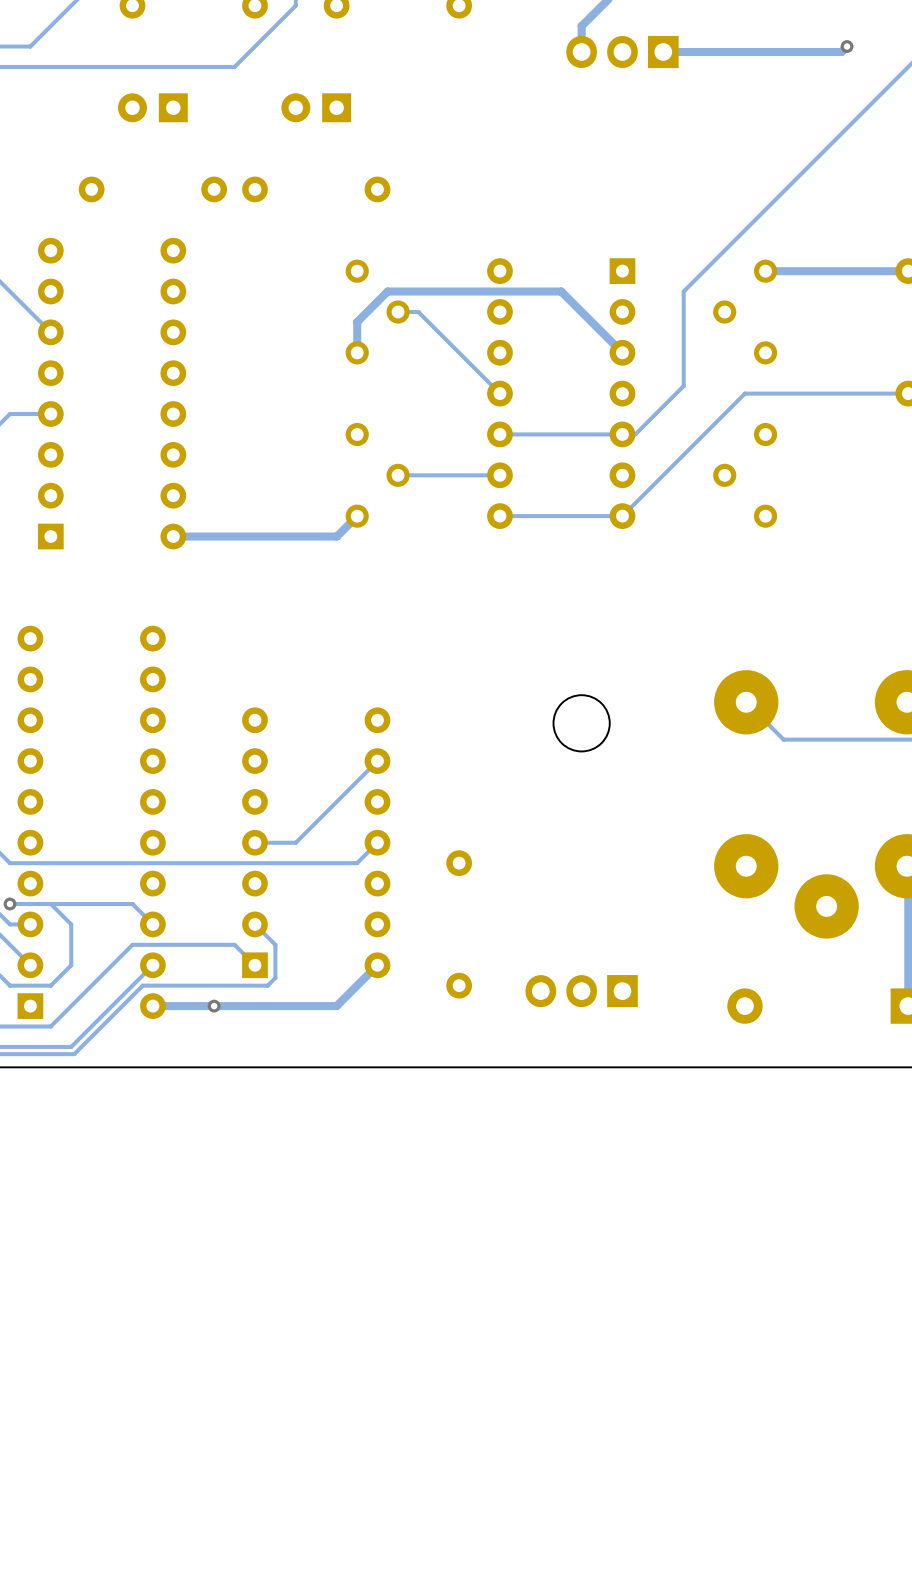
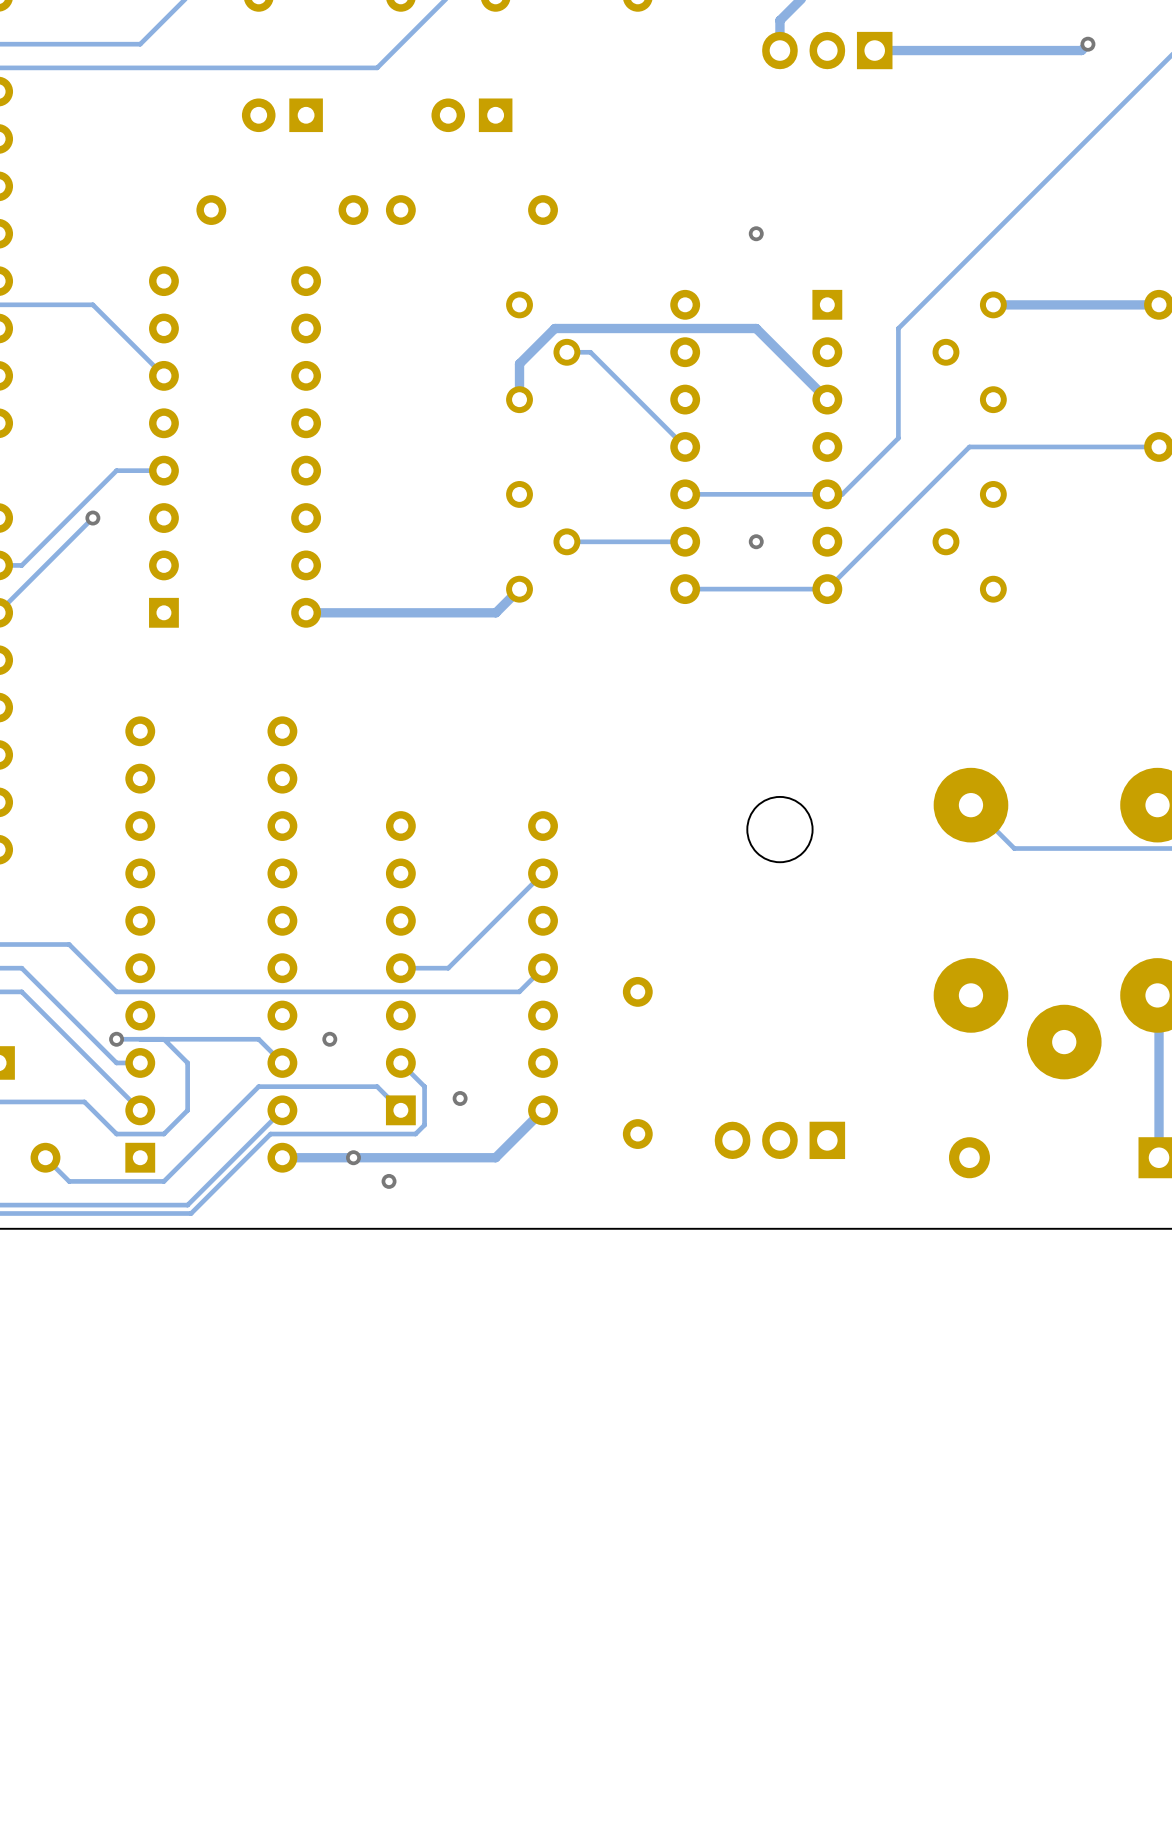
via: none -> (756, 233)
via: none -> (756, 541)
via: none -> (329, 1039)
via: none -> (460, 1098)
via: none -> (389, 1181)

